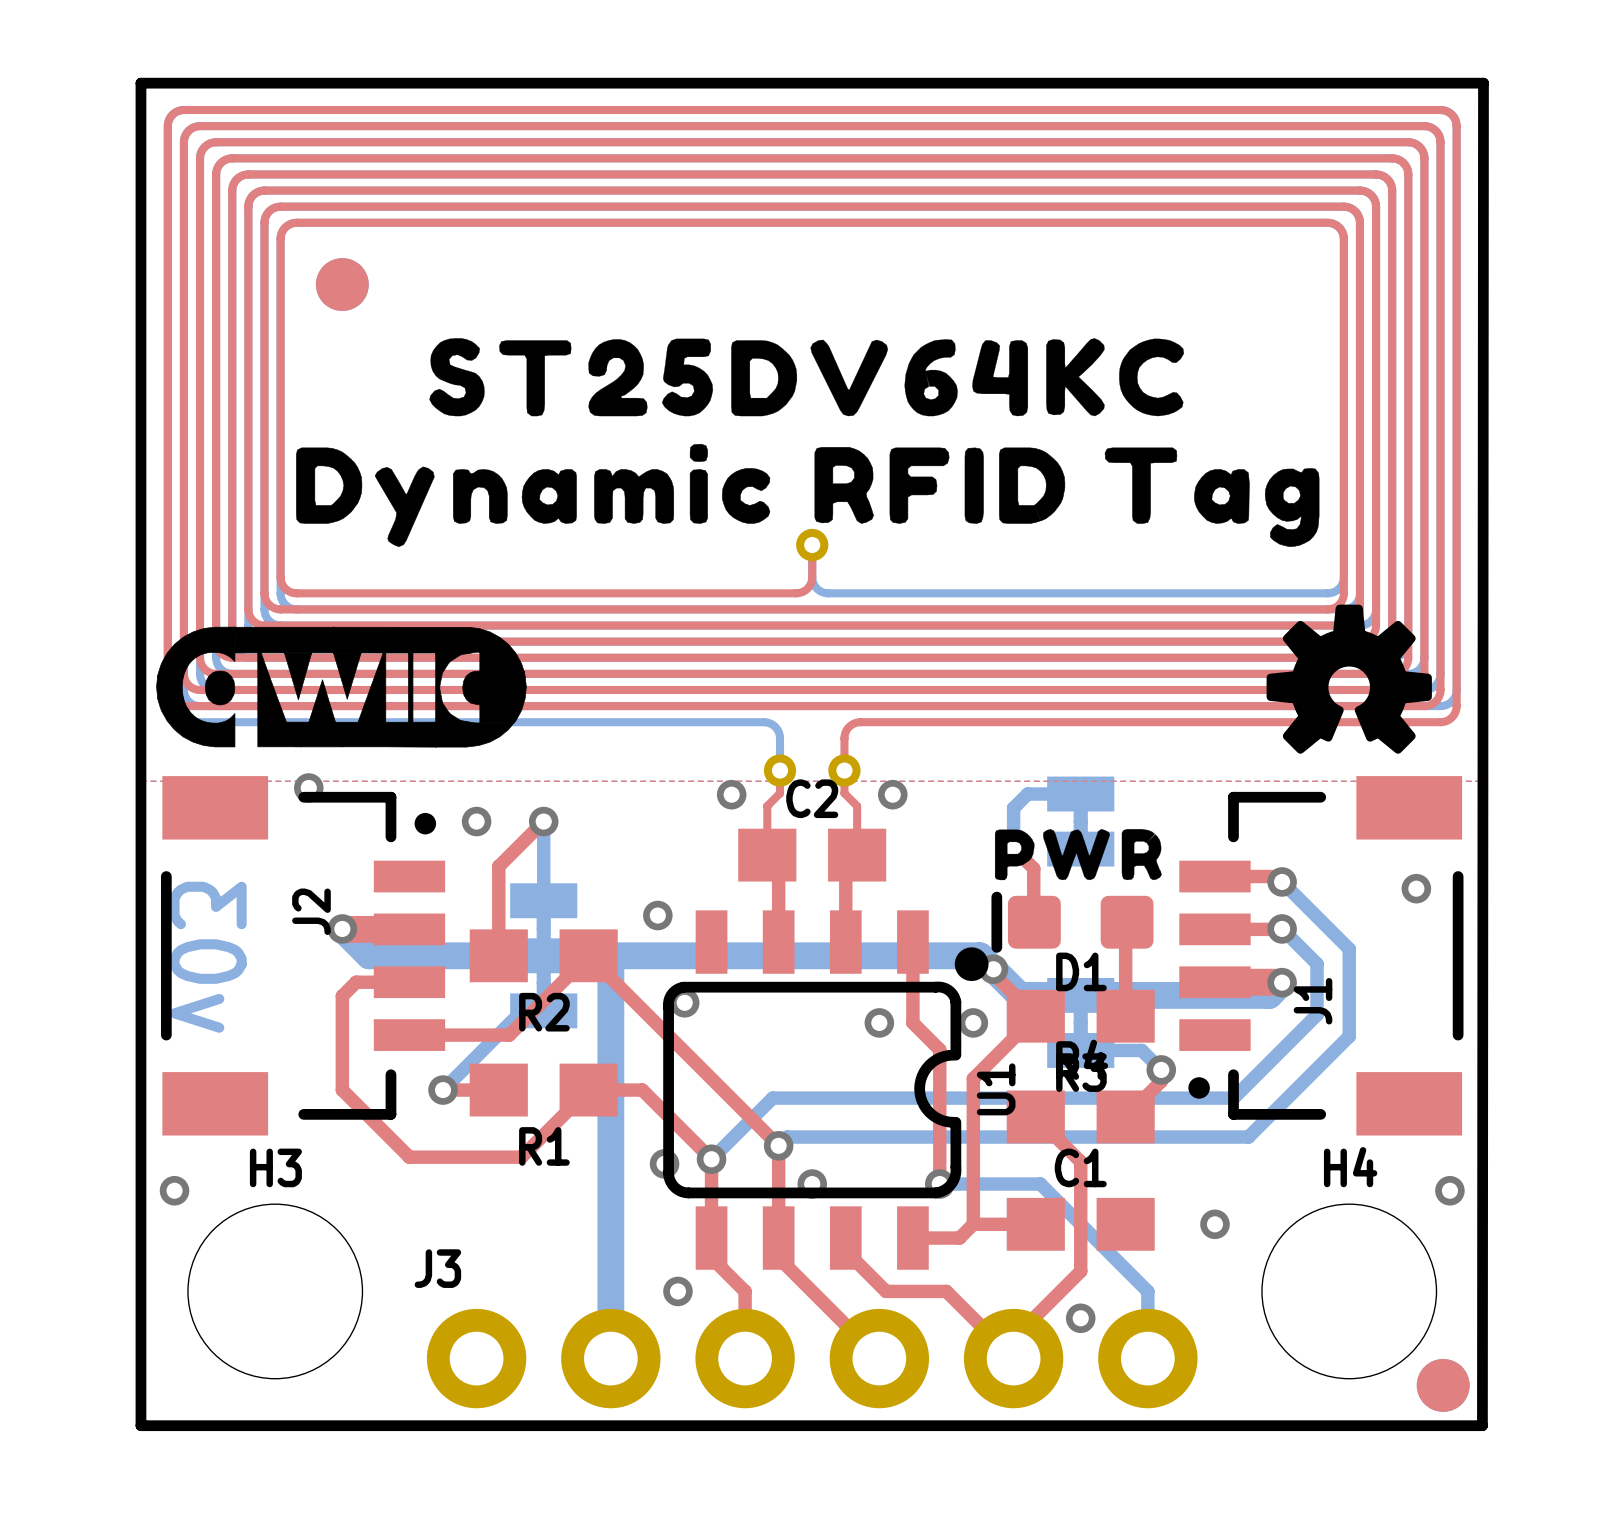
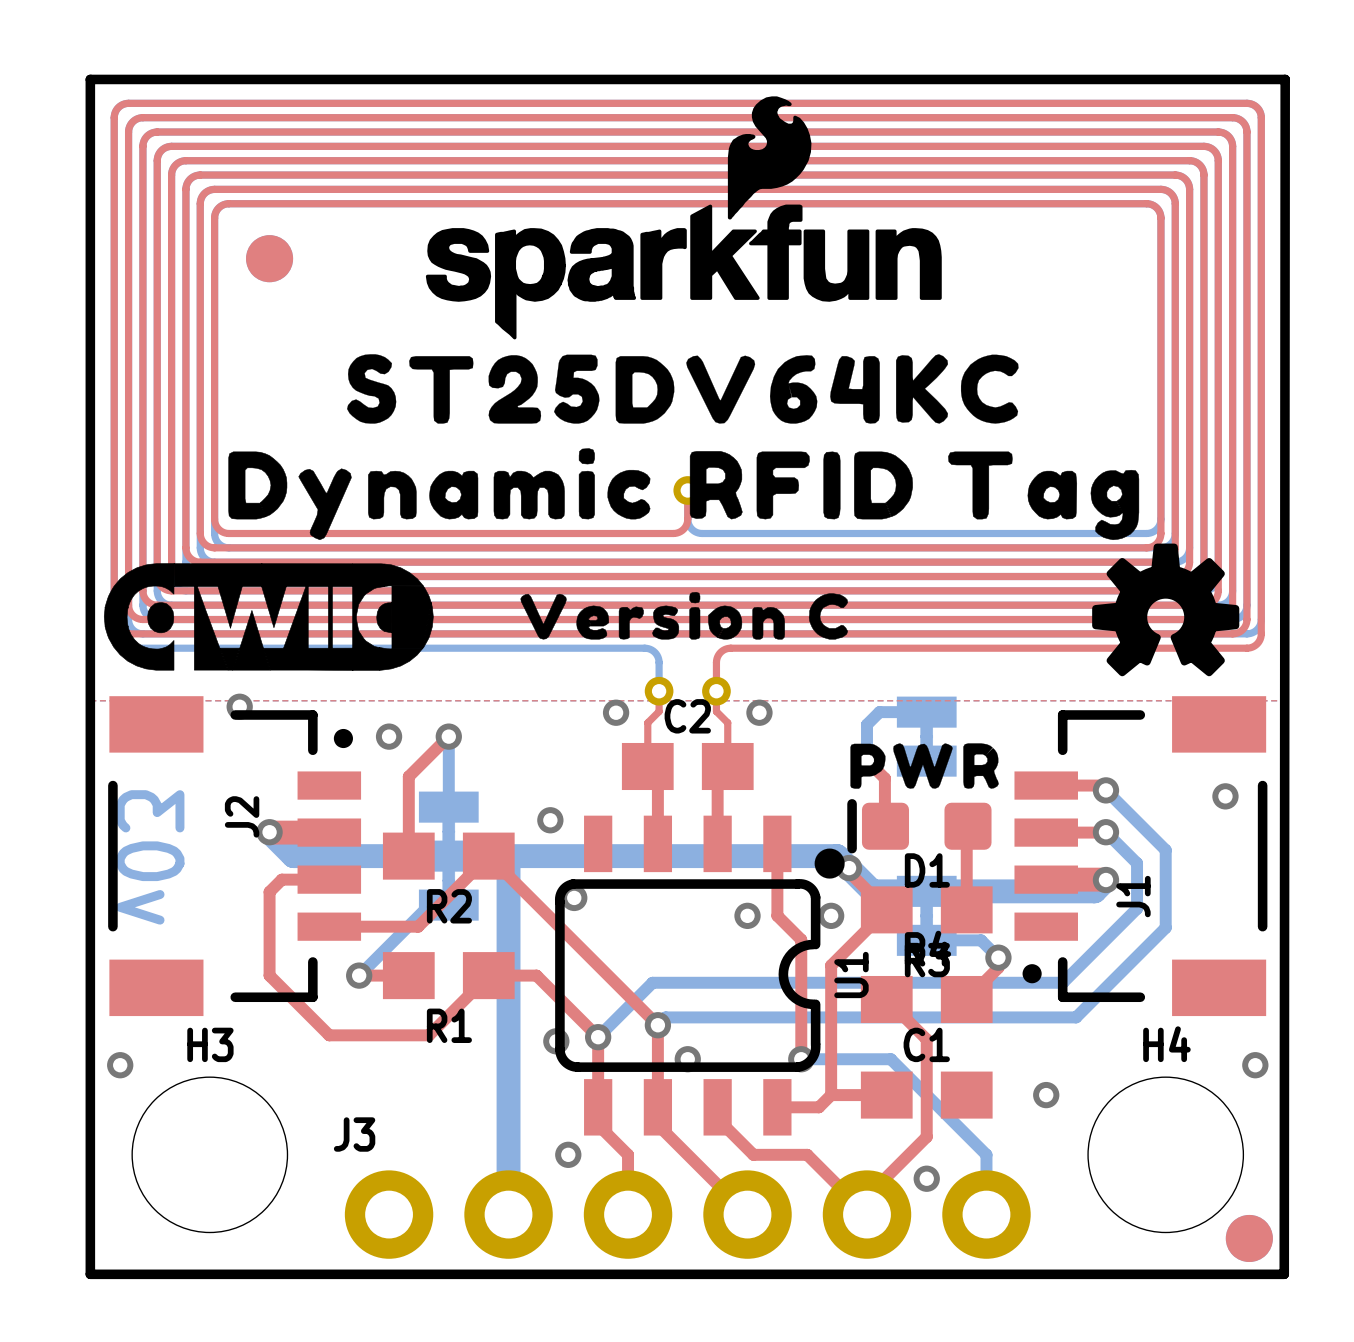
drawing: none -> [425, 96, 942, 340]
drawing position: (806, 377) -> (682, 388)
drawing position: (807, 495) -> (683, 494)
drawing: none -> [520, 591, 848, 640]

